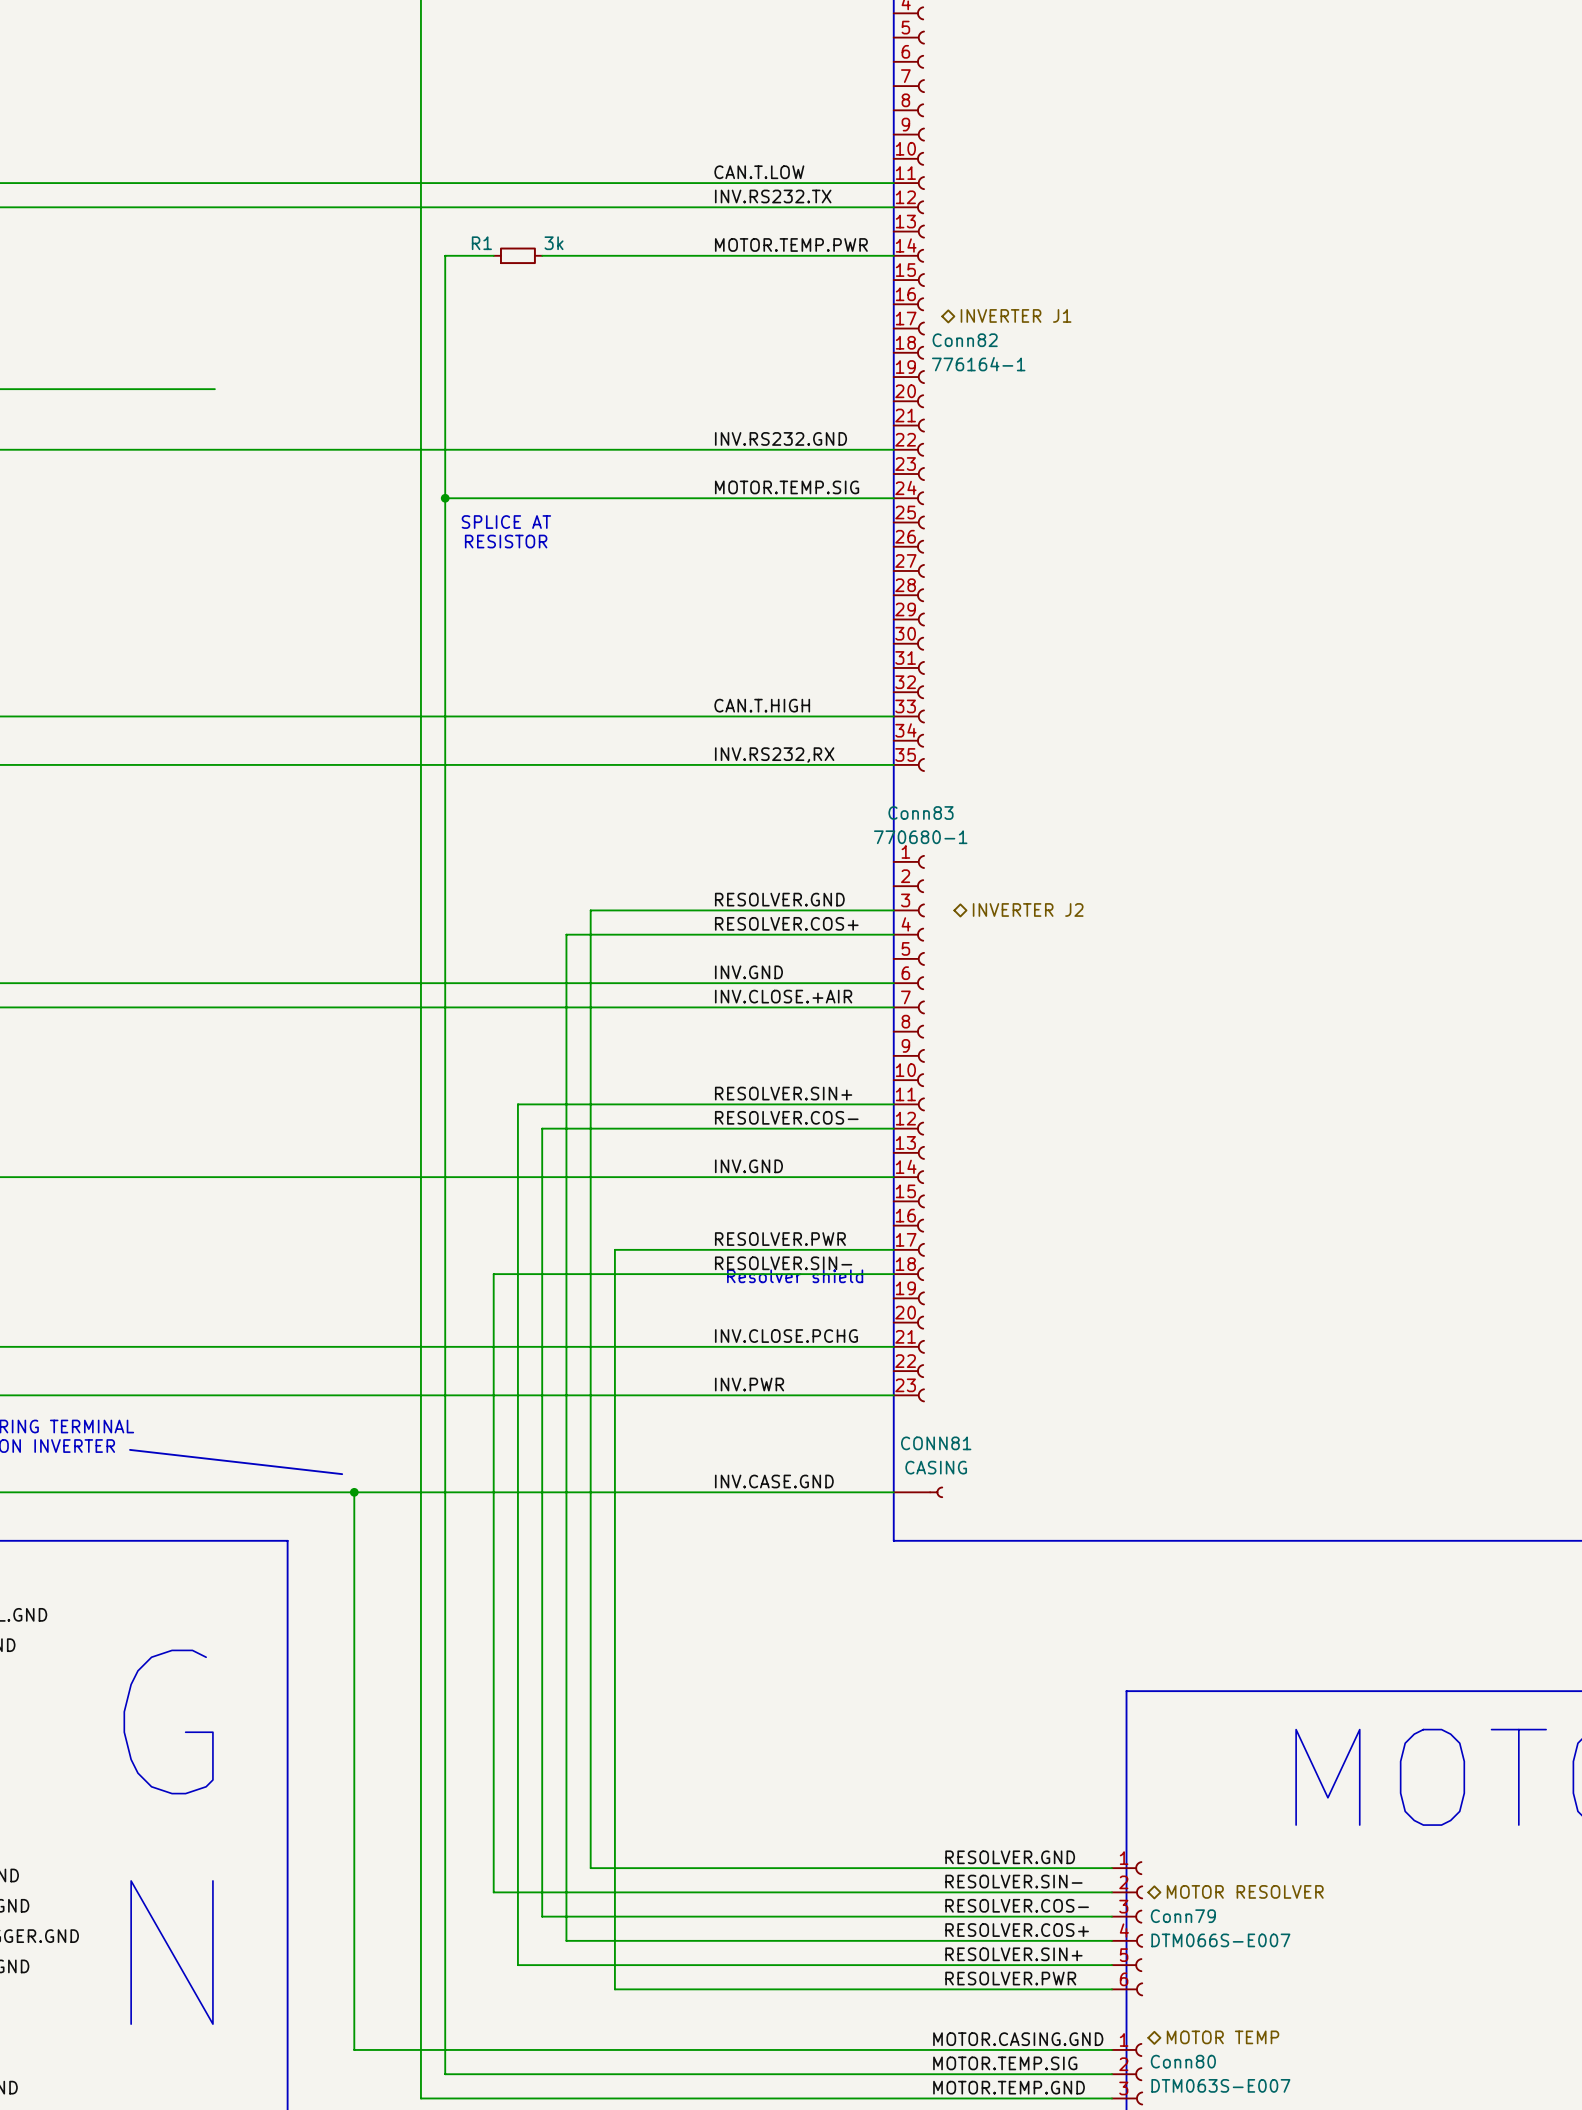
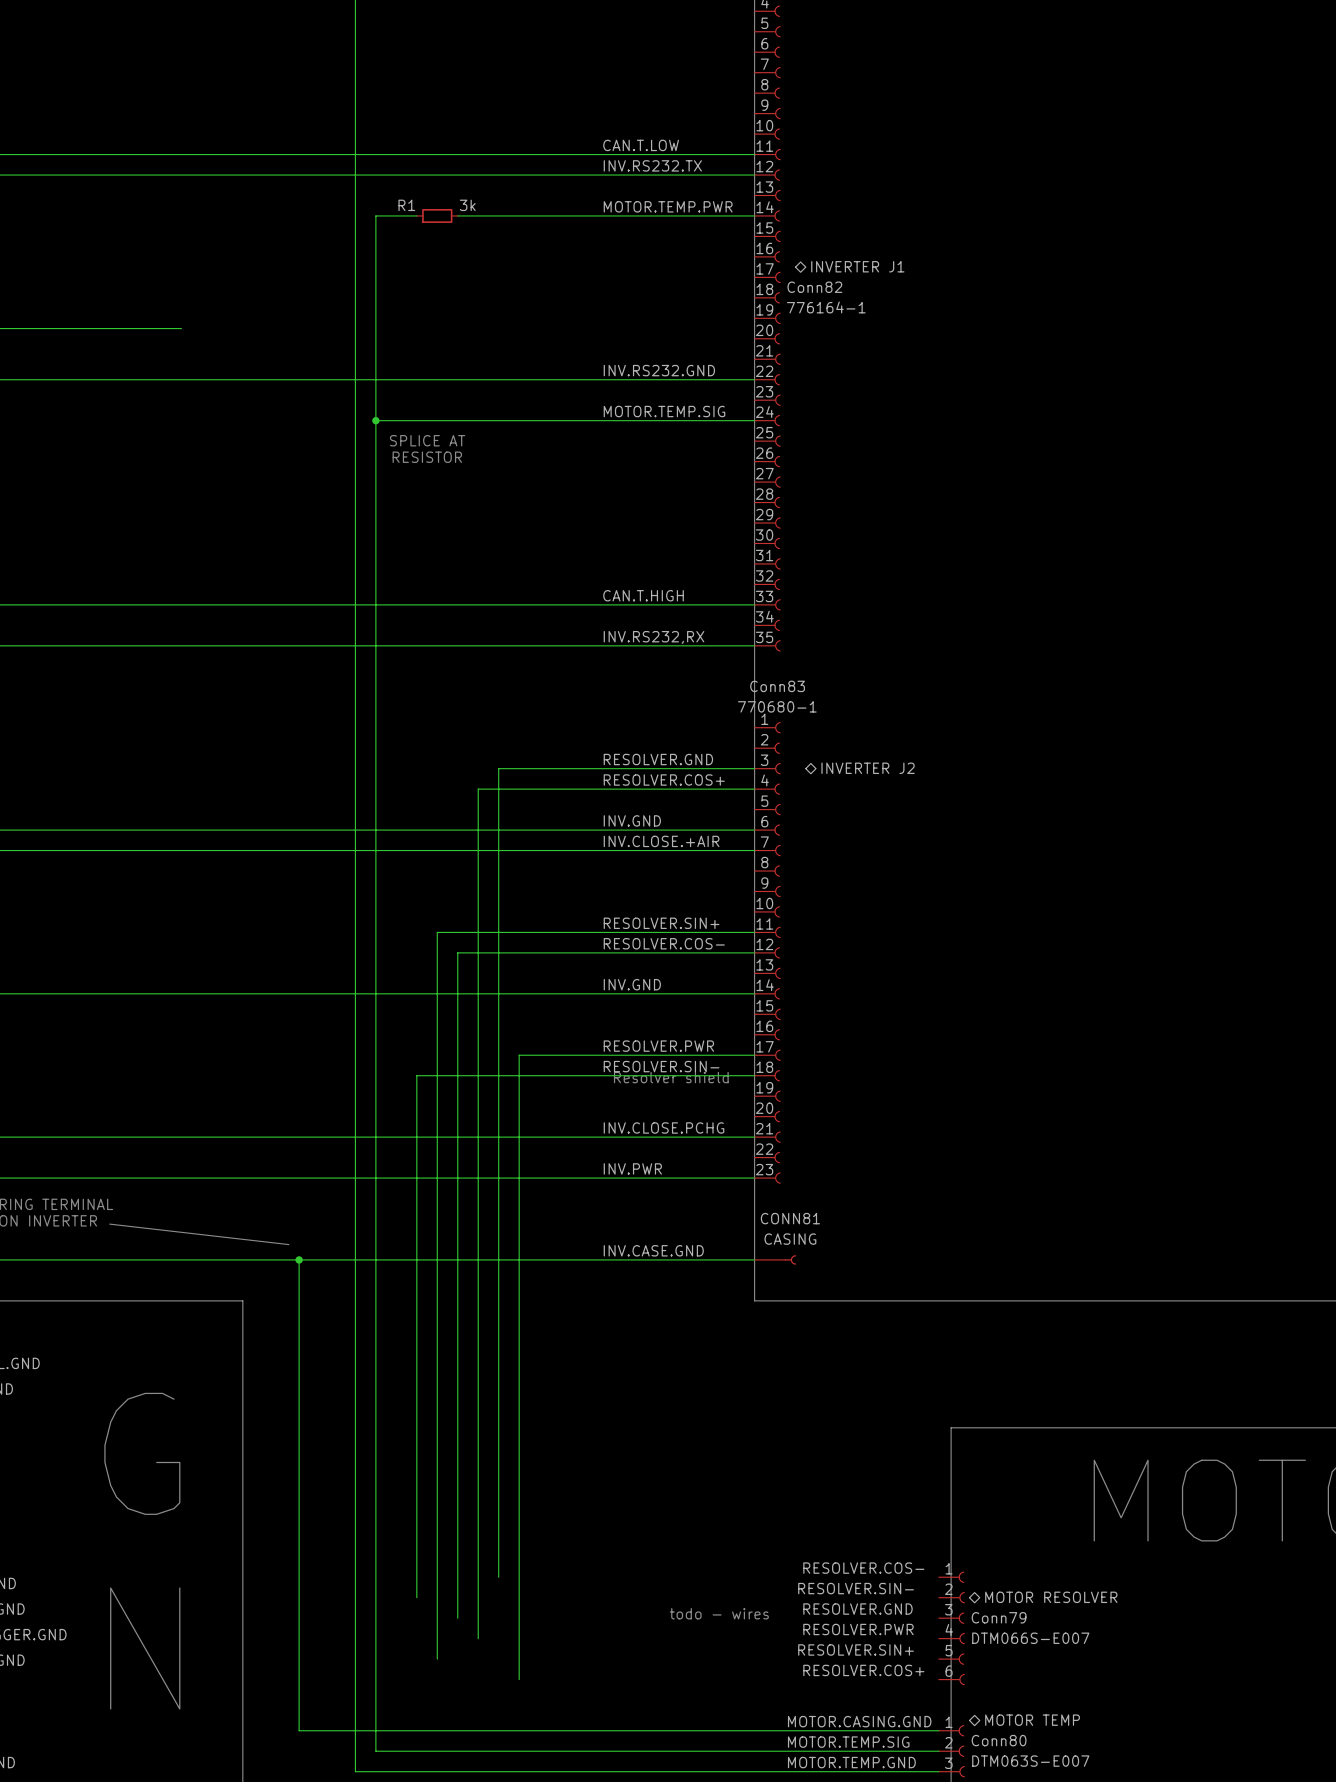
label: RESOLVER.GND (1010, 1857) -> RESOLVER.COS- (863, 1568)
wire: (590, 1868) (1111, 1868) -> none
wire: (493, 1892) (1111, 1892) -> none
label: RESOLVER.COS- (1017, 1905) -> RESOLVER.GND (857, 1609)
text: none -> todo - wires (719, 1613)
wire: (542, 1916) (1111, 1916) -> none
label: RESOLVER.COS+ (1017, 1930) -> RESOLVER.PWR (858, 1629)
wire: (566, 1940) (1111, 1940) -> none
wire: (517, 1965) (1111, 1965) -> none
label: RESOLVER.PWR (1010, 1978) -> RESOLVER.COS+ (863, 1670)
wire: (614, 1989) (1111, 1989) -> none

